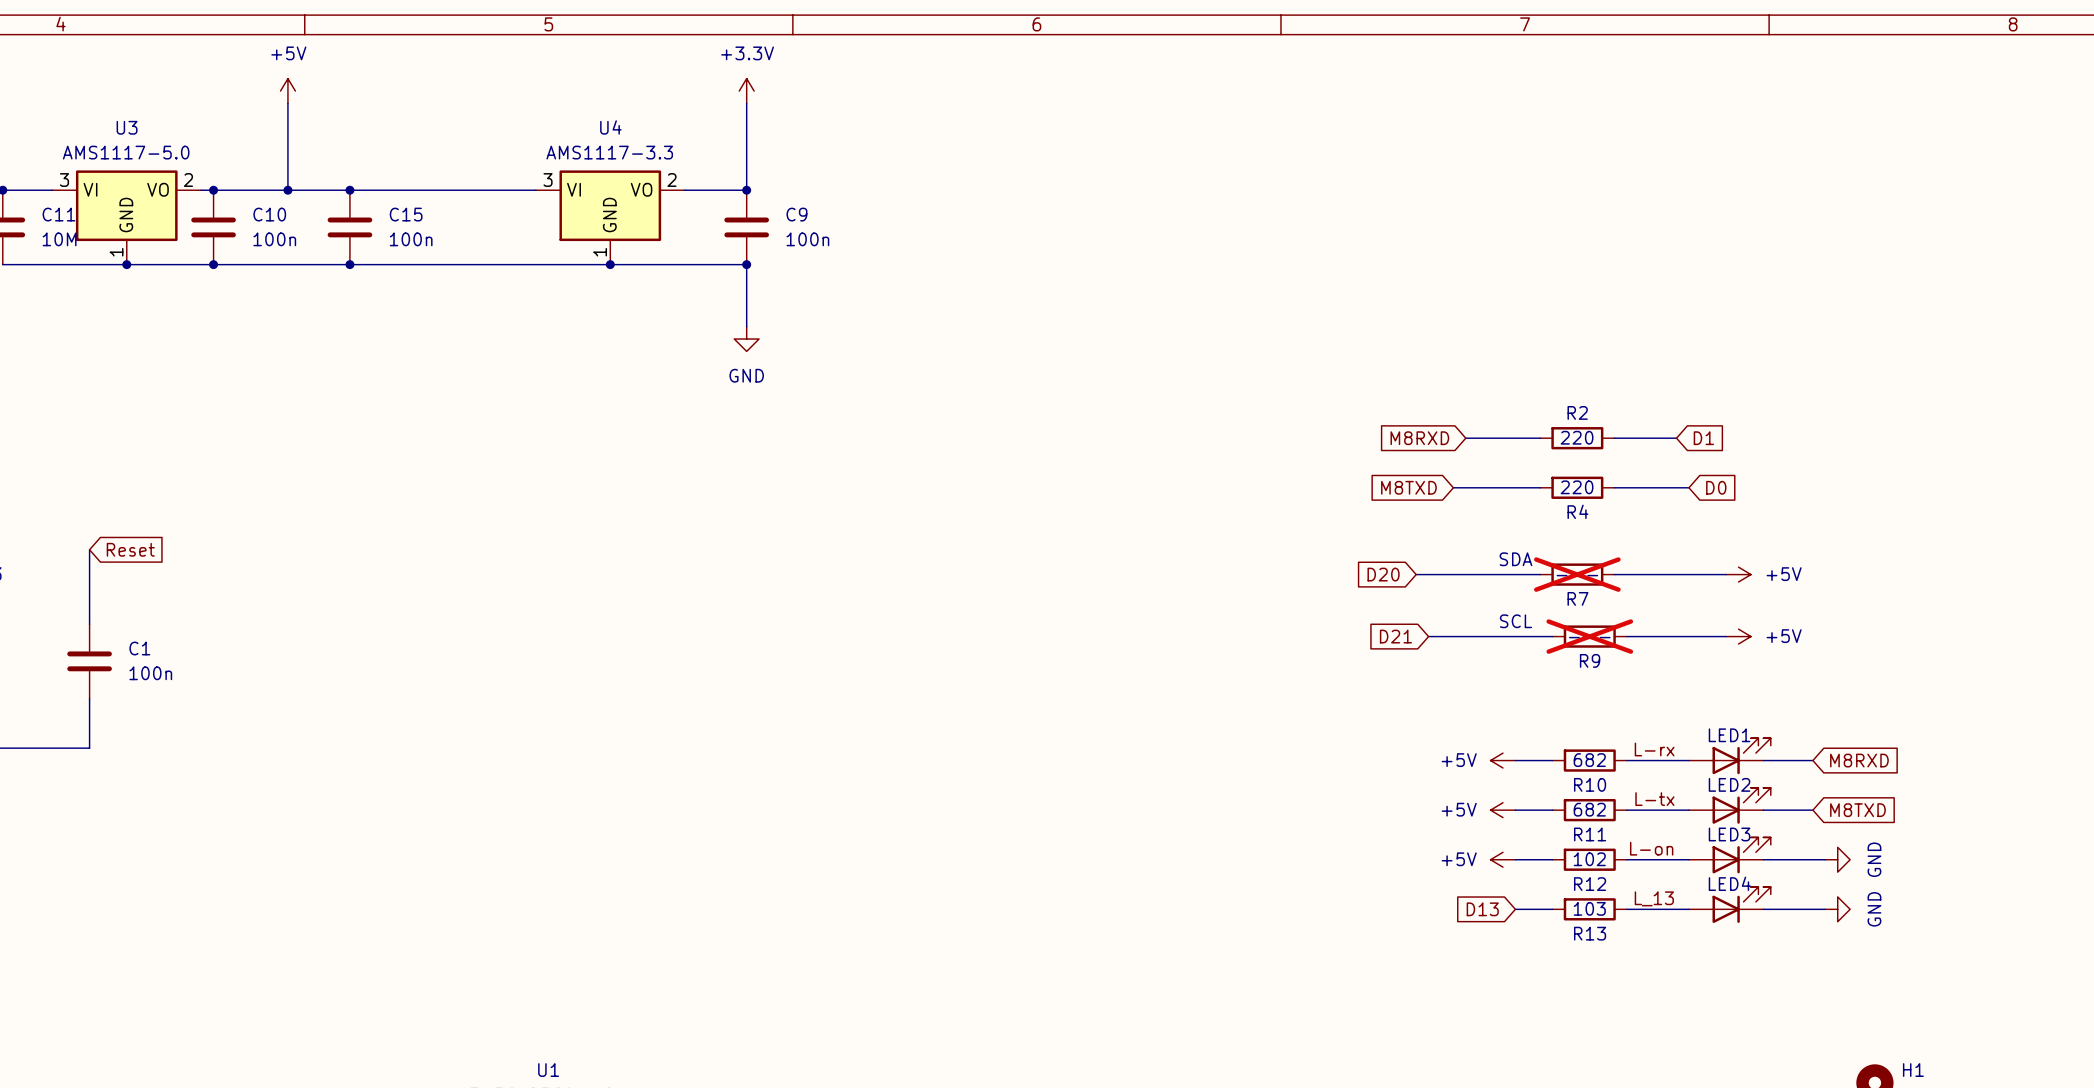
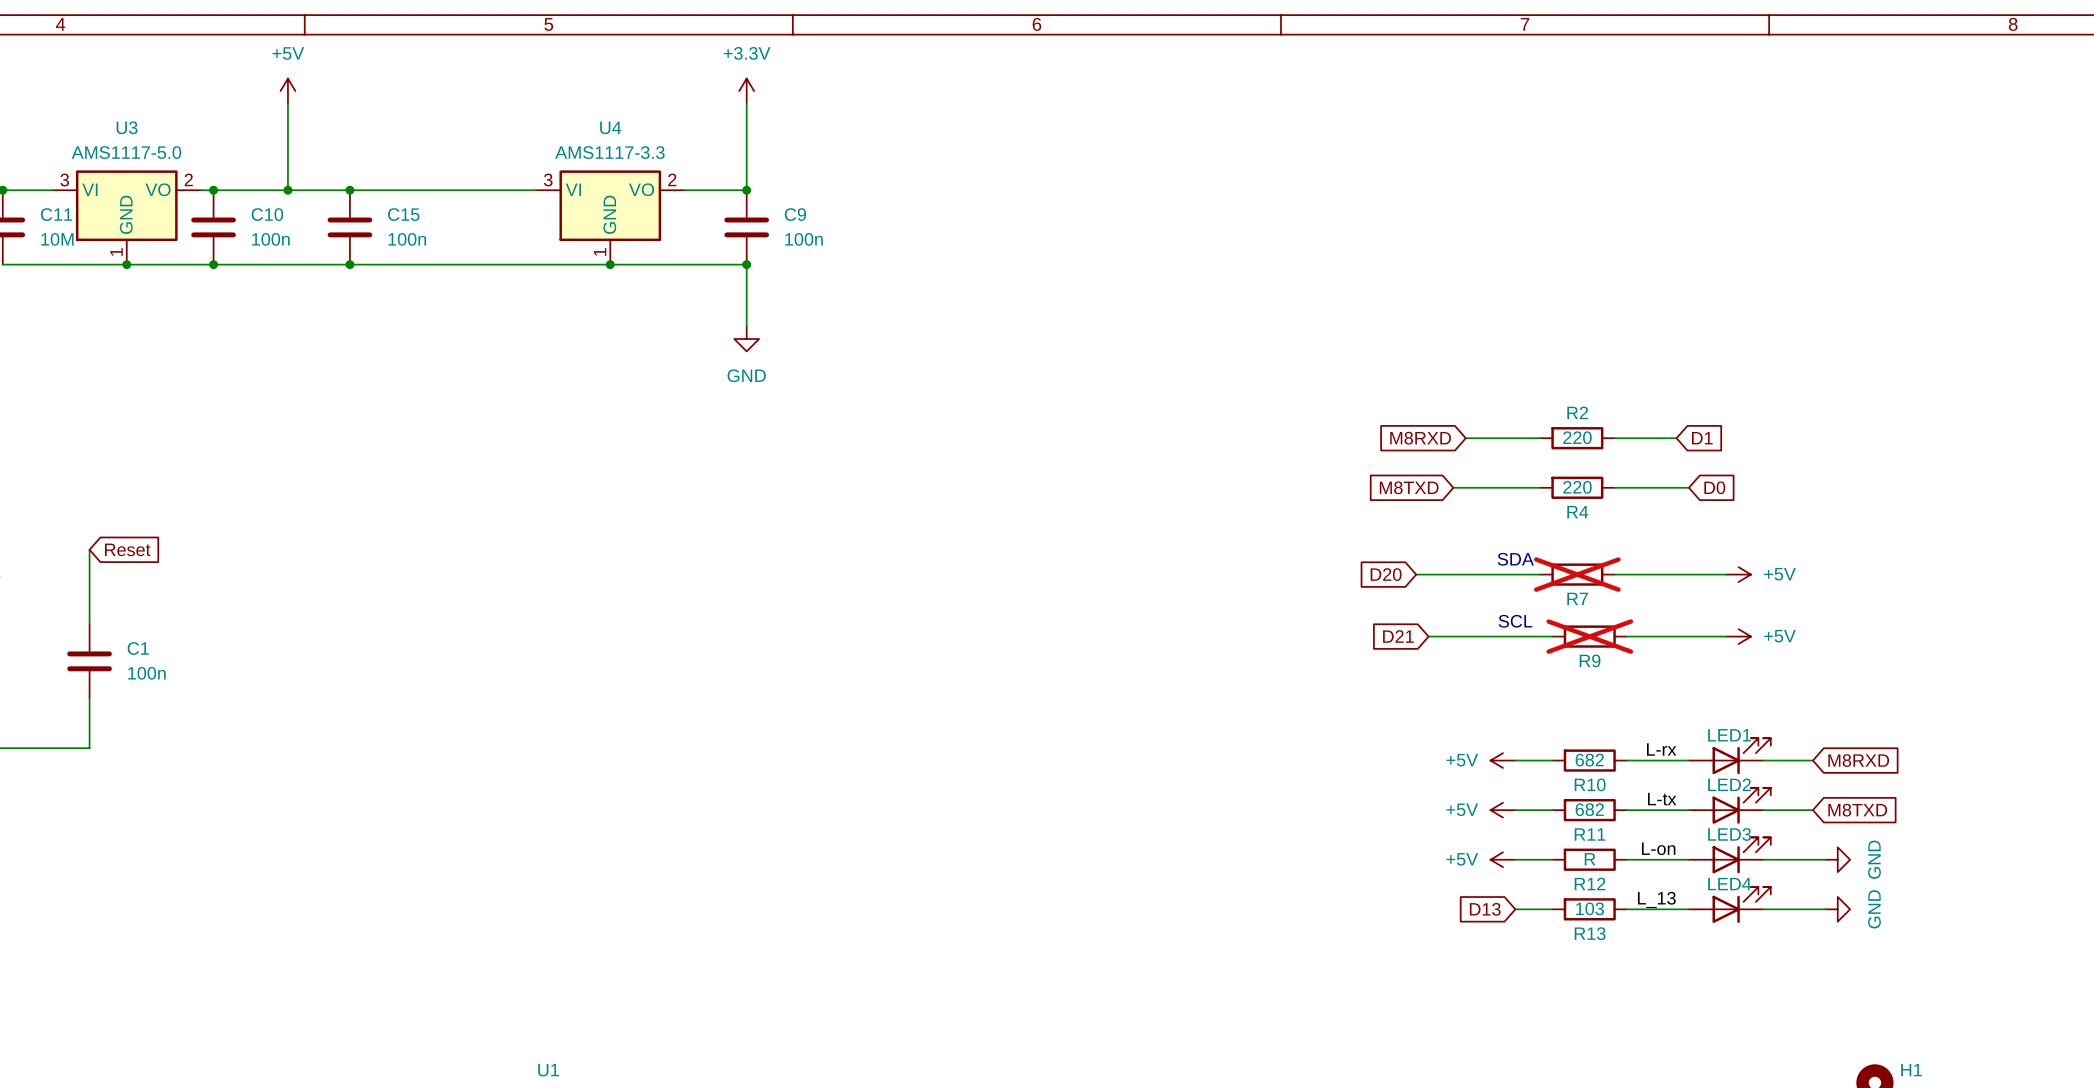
R12 value: 102 (1589, 859) -> R (1590, 859)

